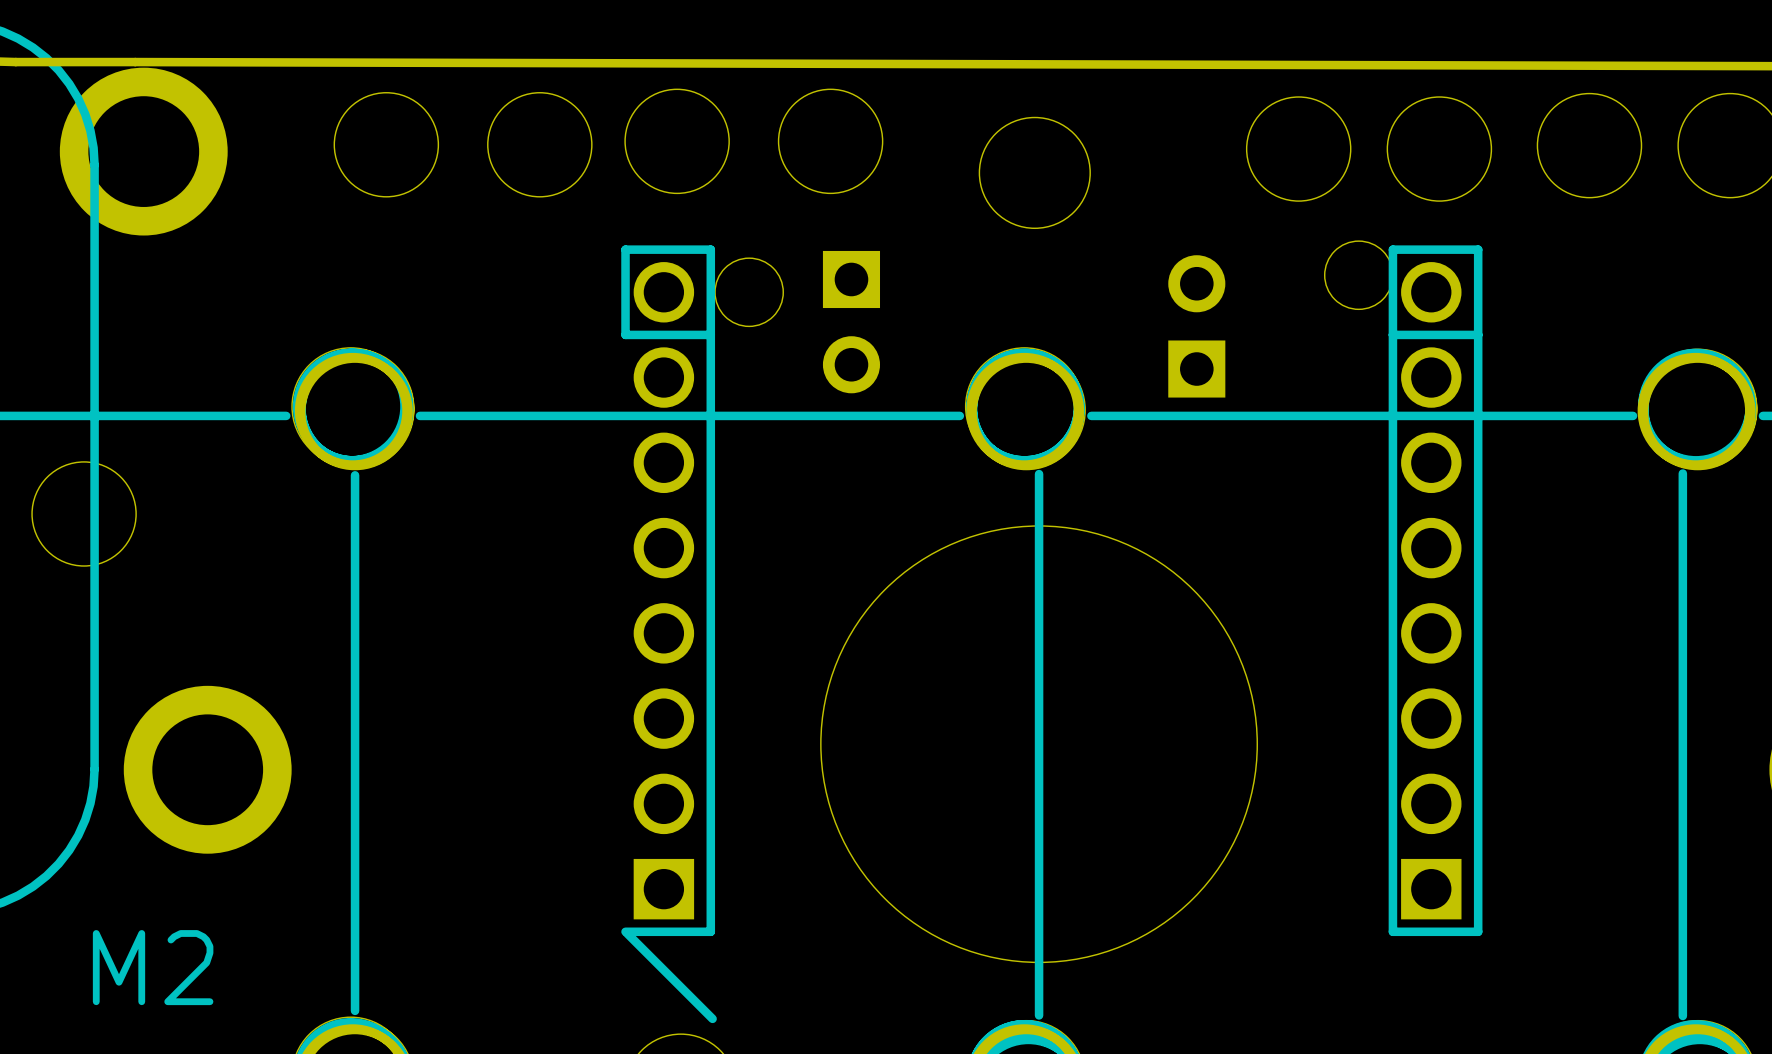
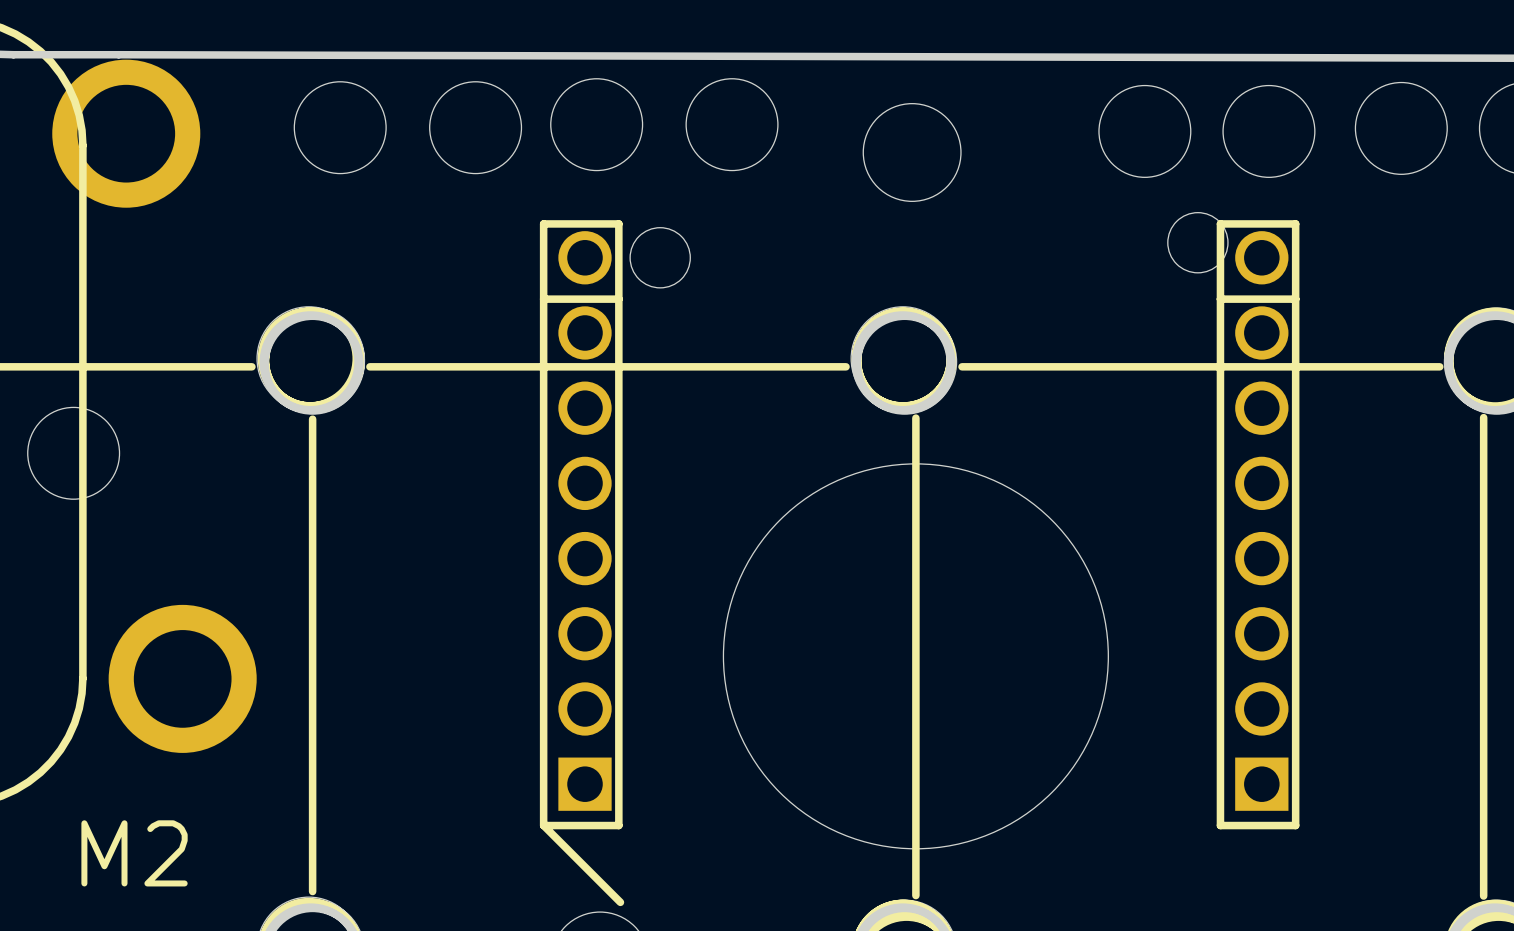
drawing shape: [621, 245, 1483, 1024] -> [539, 220, 1300, 907]
part: (851, 322) -> none
part: (1196, 326) -> none

